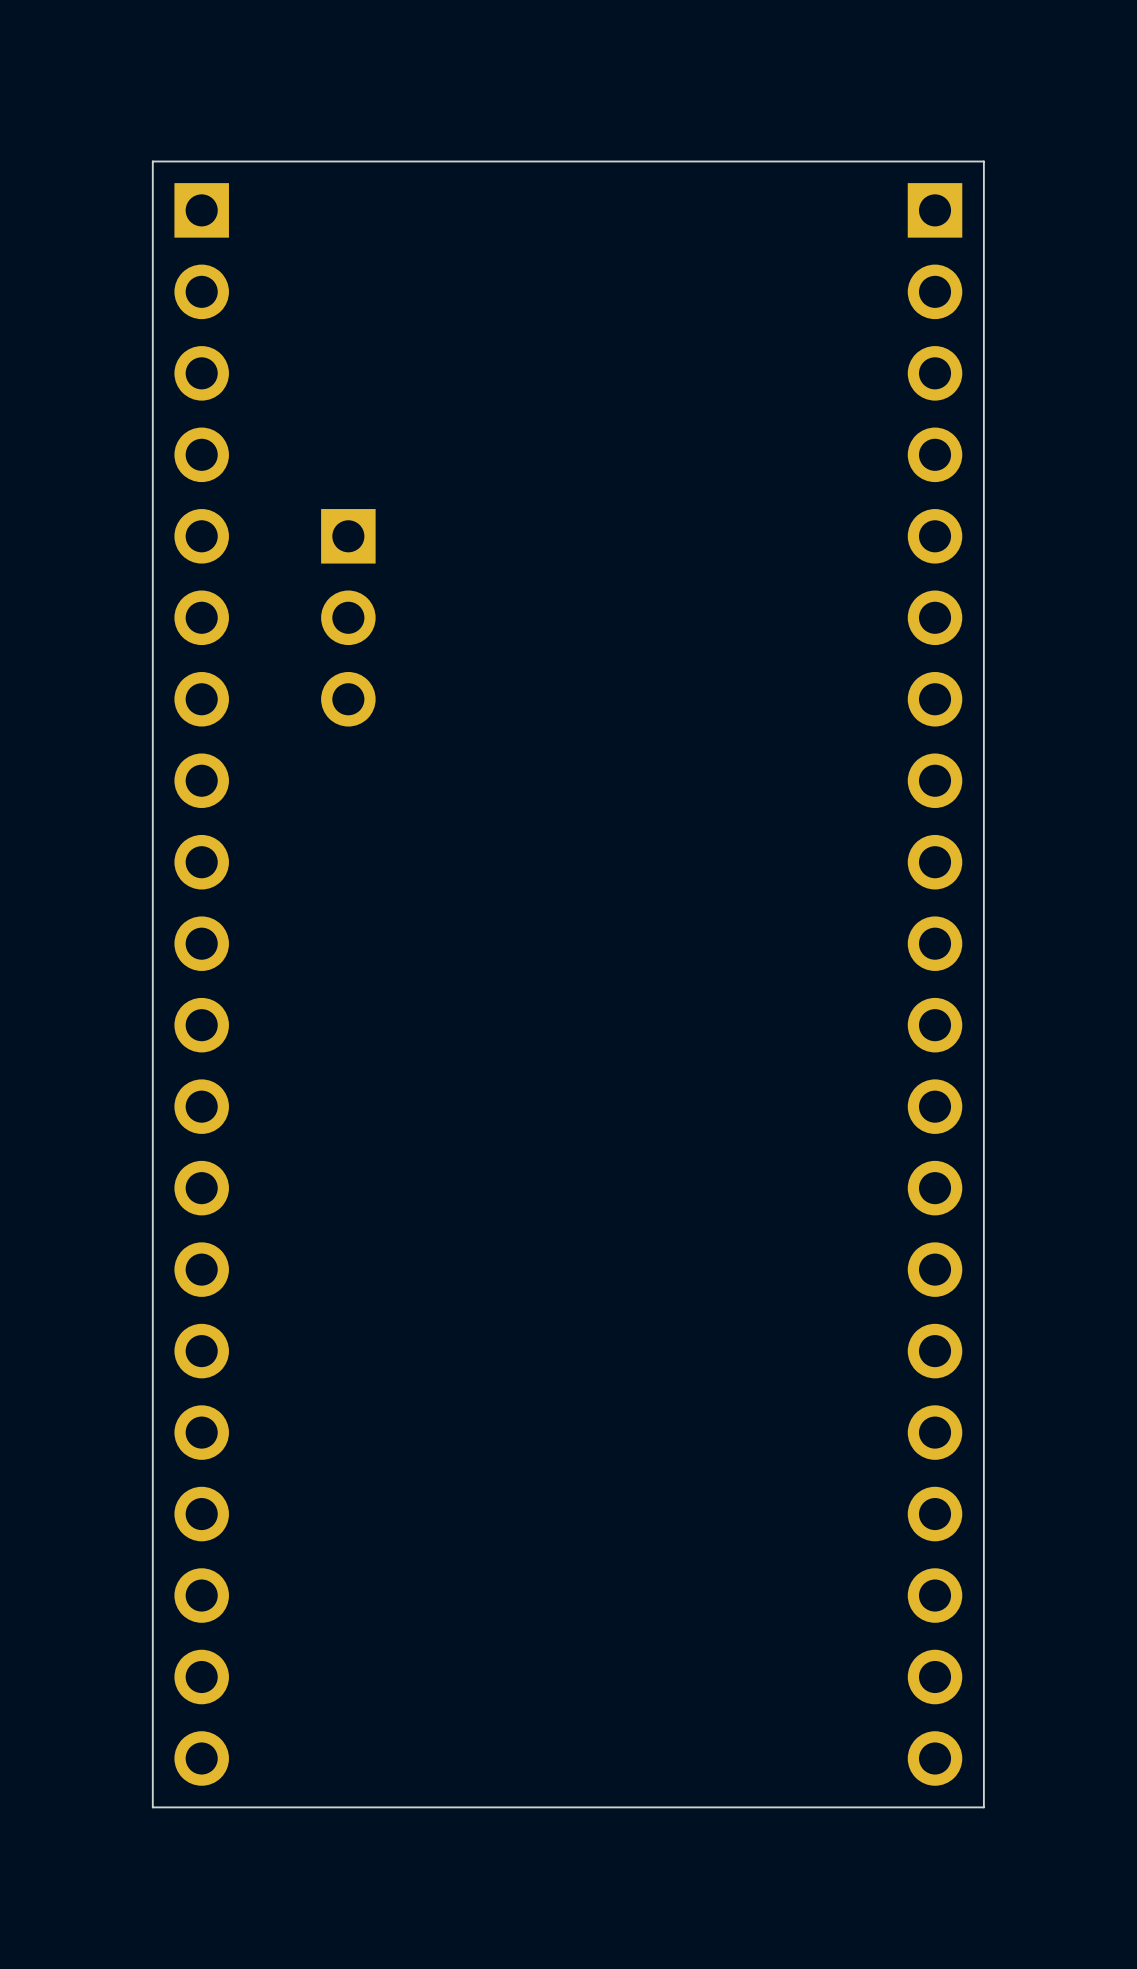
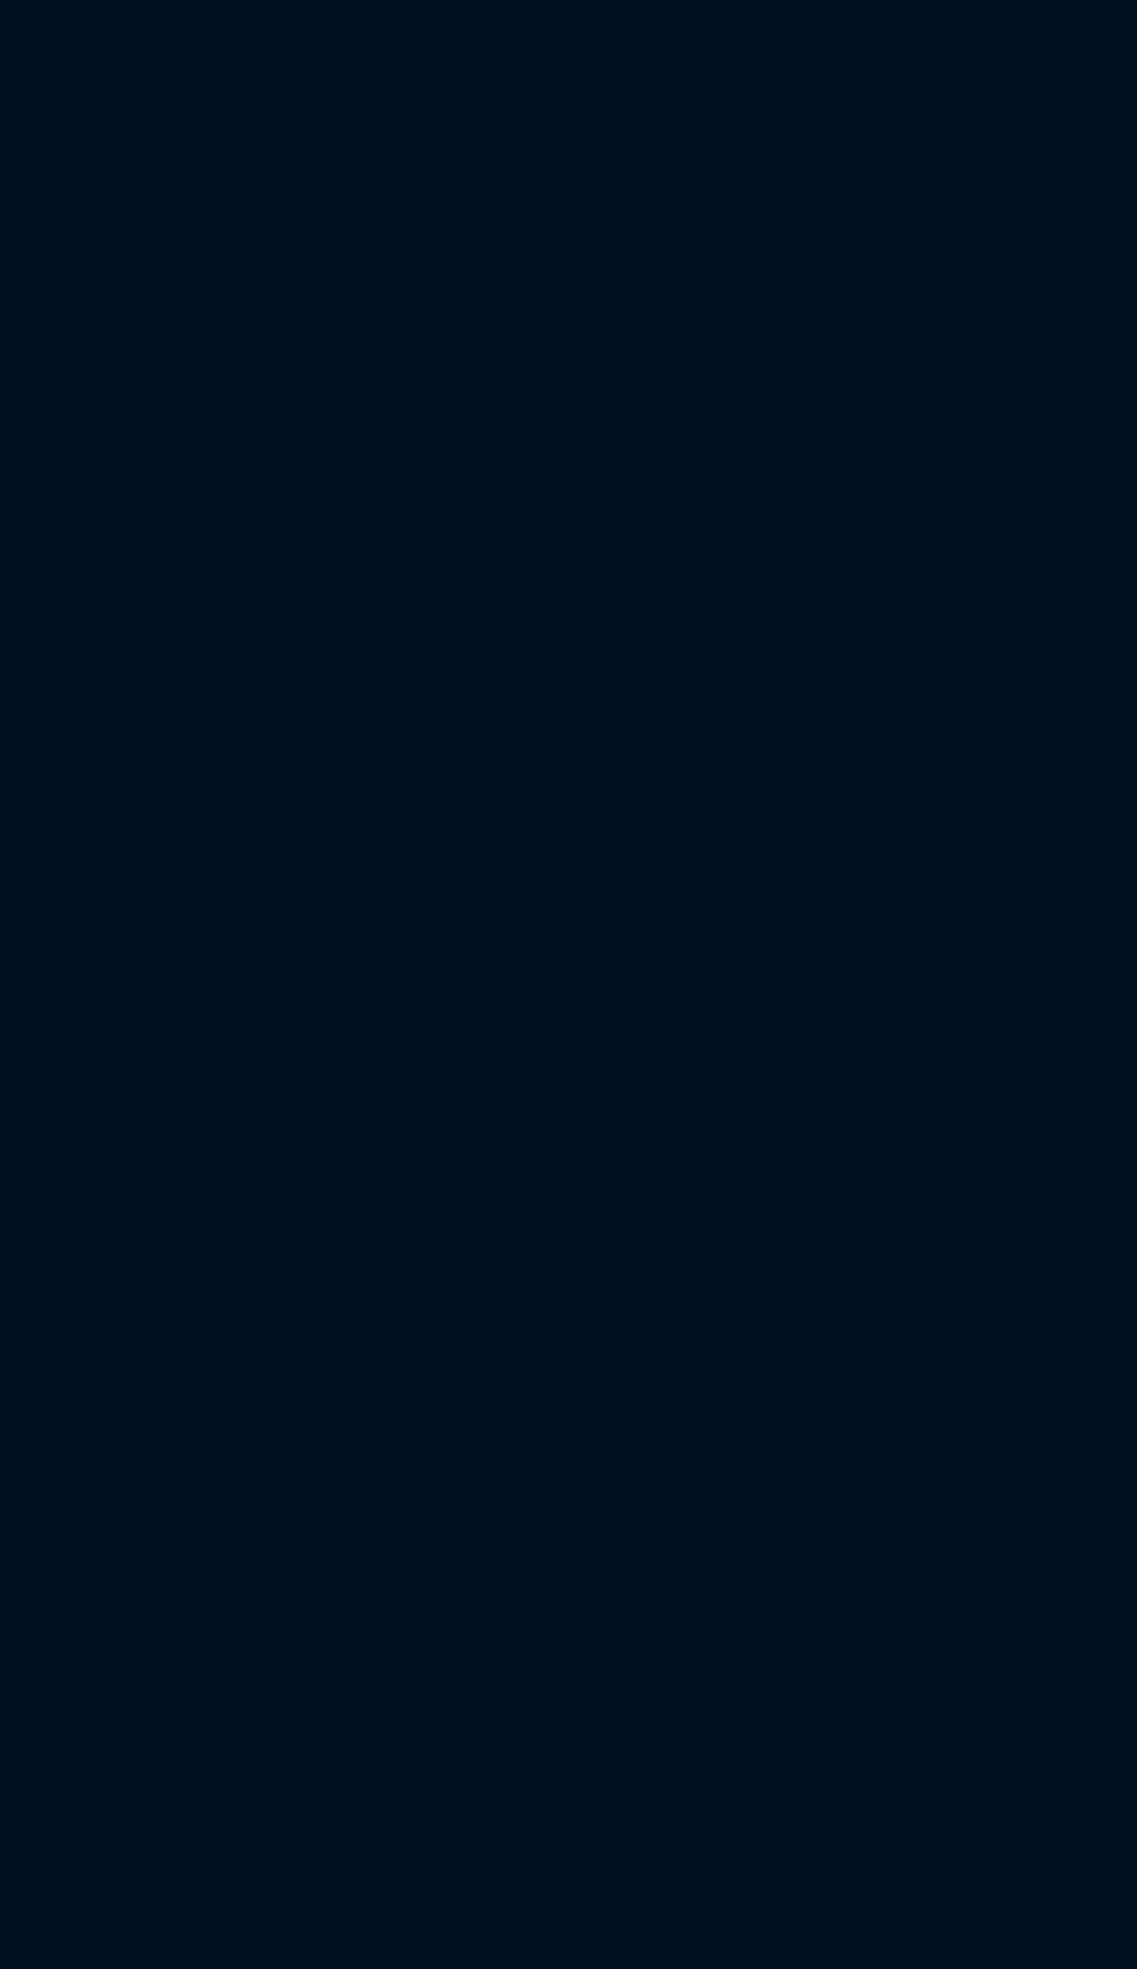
board edge: (983, 161) (983, 1807) (152, 1807) (152, 161) (983, 161) -> none
part: (348, 617) -> none
part: (201, 984) -> none
part: (935, 984) -> none

